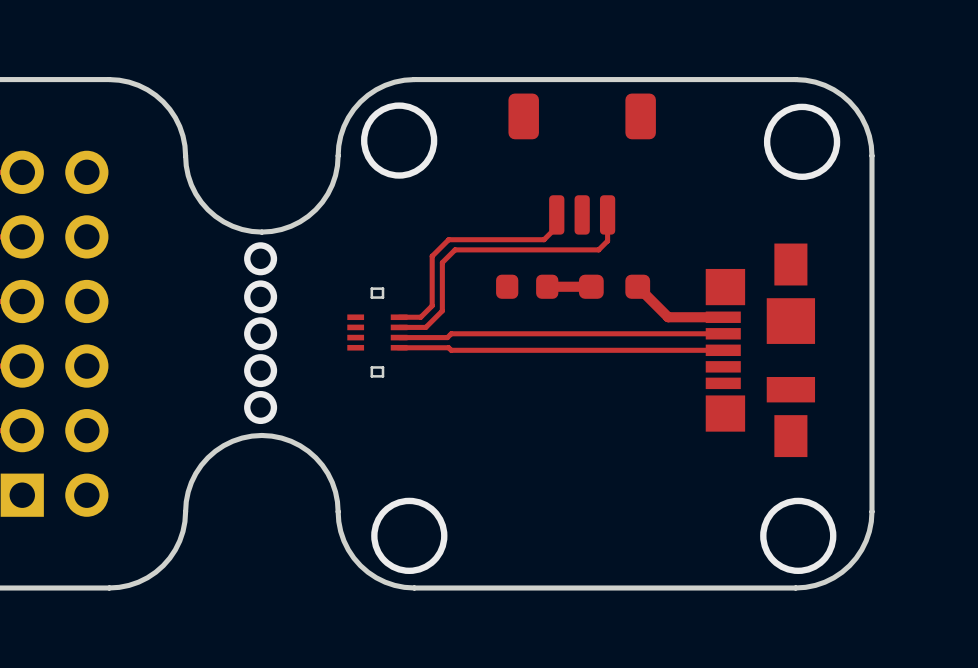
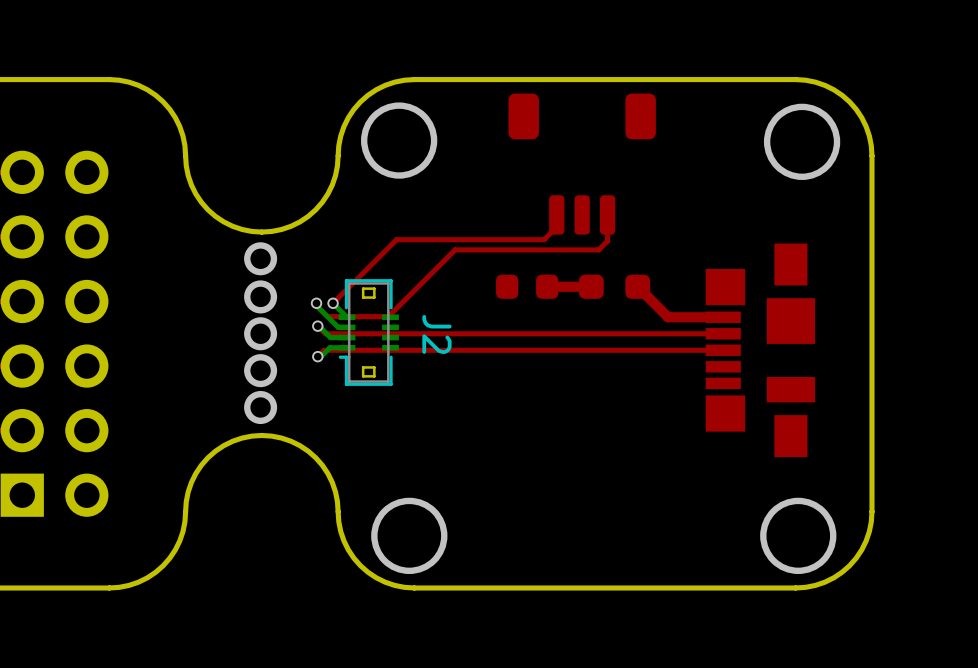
top track: (448, 239) (432, 256) (432, 305) (420, 317) (399, 317) -> (448, 239) (396, 239) (333, 303)
top track: (442, 262) (442, 310) (425, 327) (399, 327) -> (442, 262) (388, 316) (327, 316) (316, 305) (316, 303)
bottom track: none -> (316, 303) (316, 305) (338, 327) (347, 327)
via: none -> (316, 303)
bottom track: none -> (333, 303) (347, 317)
via: none -> (333, 303)
bottom track: none -> (317, 326) (330, 337) (347, 337)
via: none -> (317, 326)
J2 side: top (377, 332) -> bottom (368, 332)
top track: (451, 333) (447, 337) (399, 337) -> (451, 333) (325, 333) (317, 326)
bottom track: none -> (347, 347) (329, 347) (320, 356) (317, 356)
top track: (397, 347) (448, 347) (451, 350) -> (317, 356) (324, 350) (451, 350)
via: none -> (317, 356)

